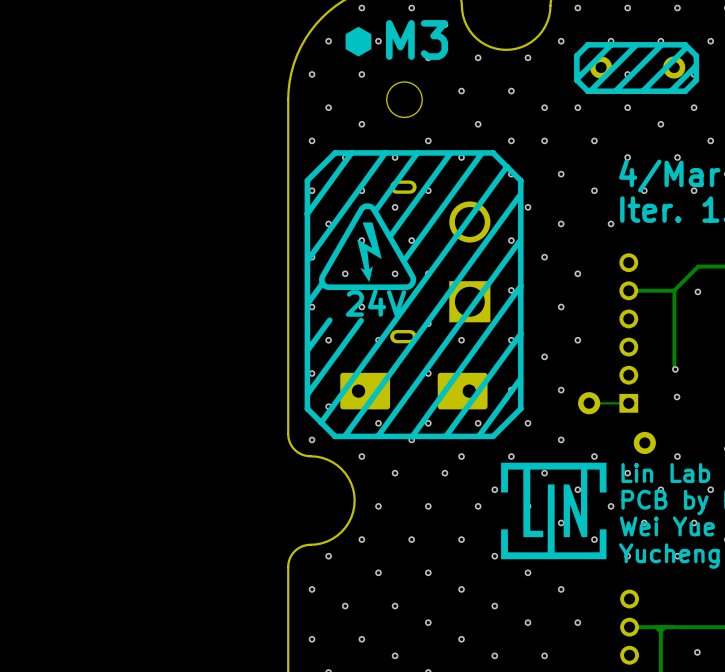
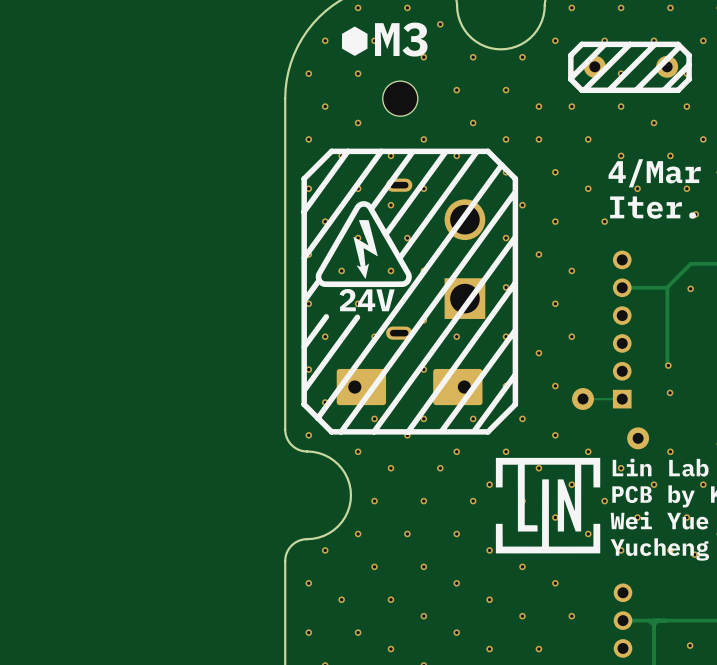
via: none -> (695, 214)
via: none -> (694, 554)

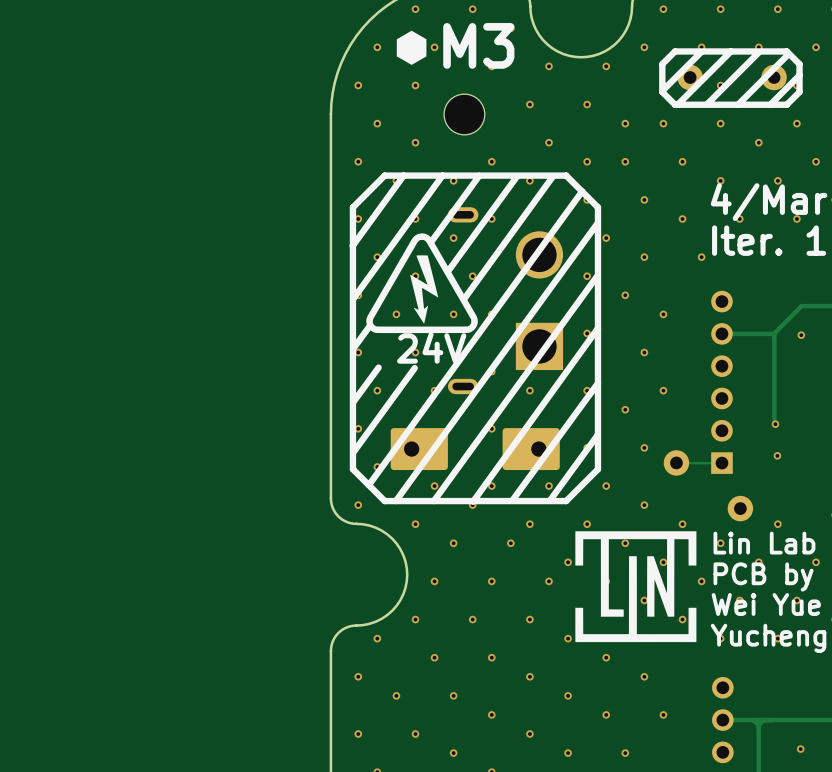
via: (695, 214) -> none
via: (694, 554) -> none

